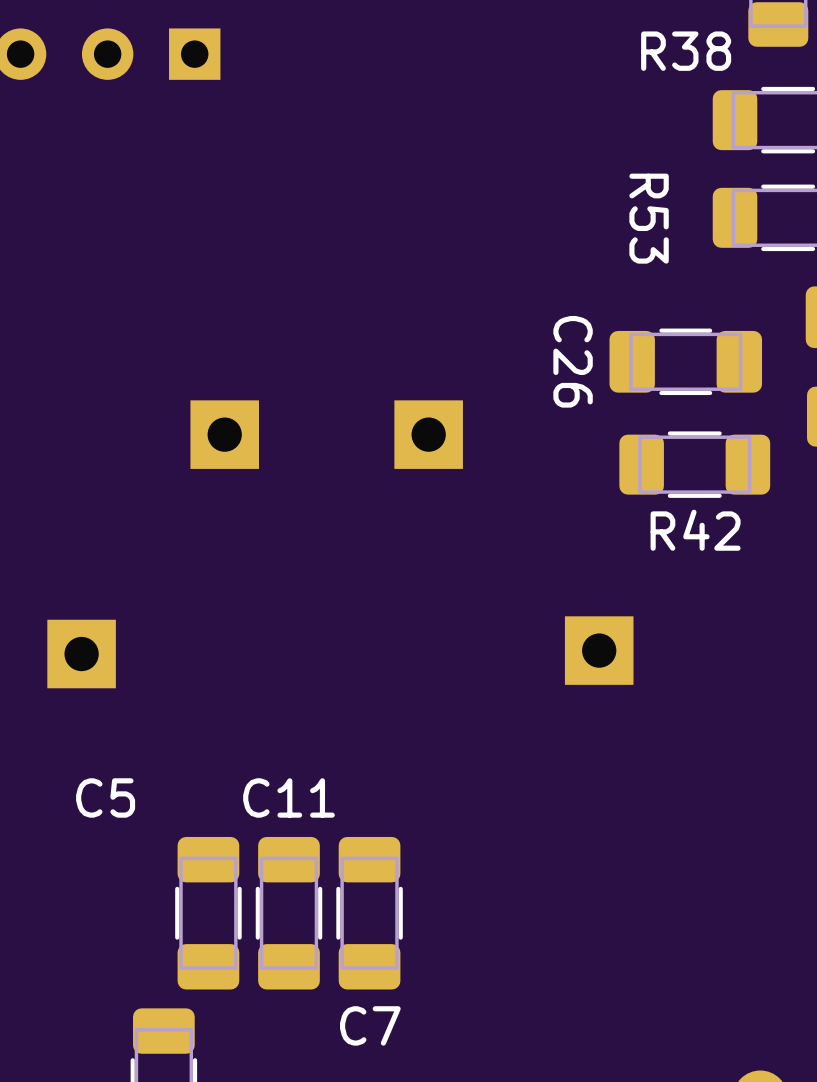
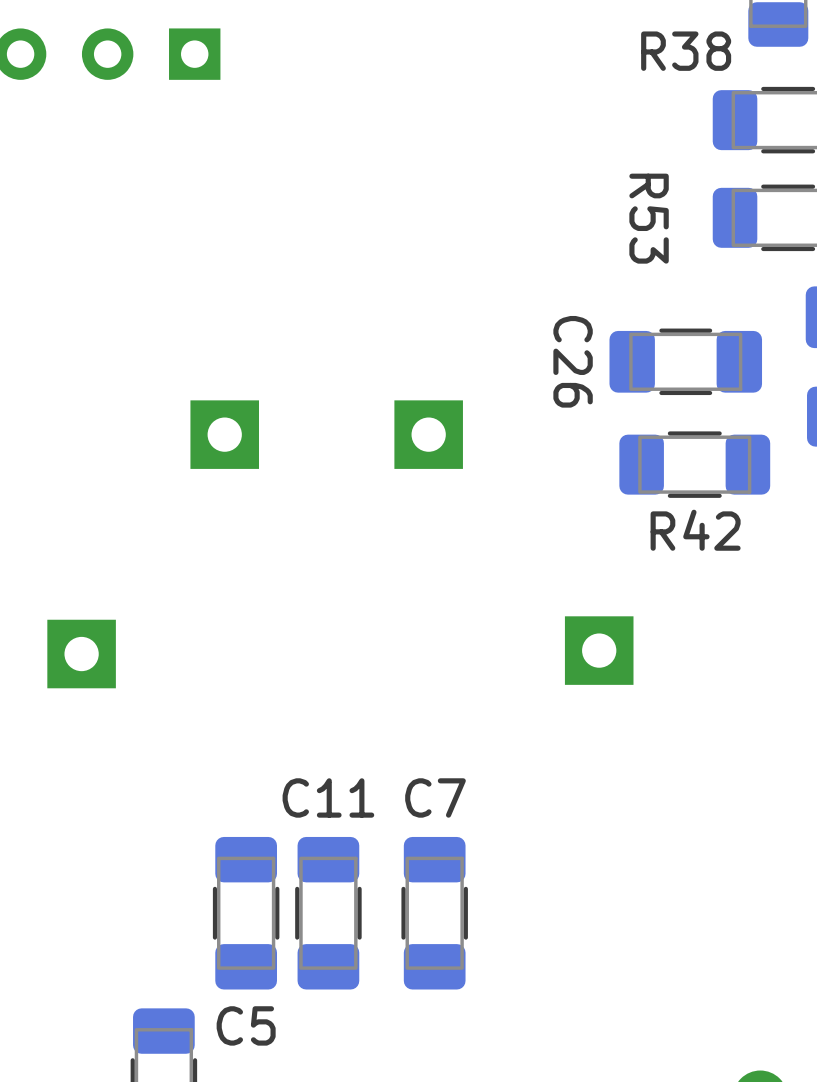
C5 name position: C5 (105, 797) -> C5 (246, 1025)
C5 position: (208, 913) -> (246, 913)
C11 position: (288, 913) -> (328, 913)
C7 position: (369, 913) -> (434, 913)
C7 name position: C7 (370, 1025) -> C7 (435, 797)

